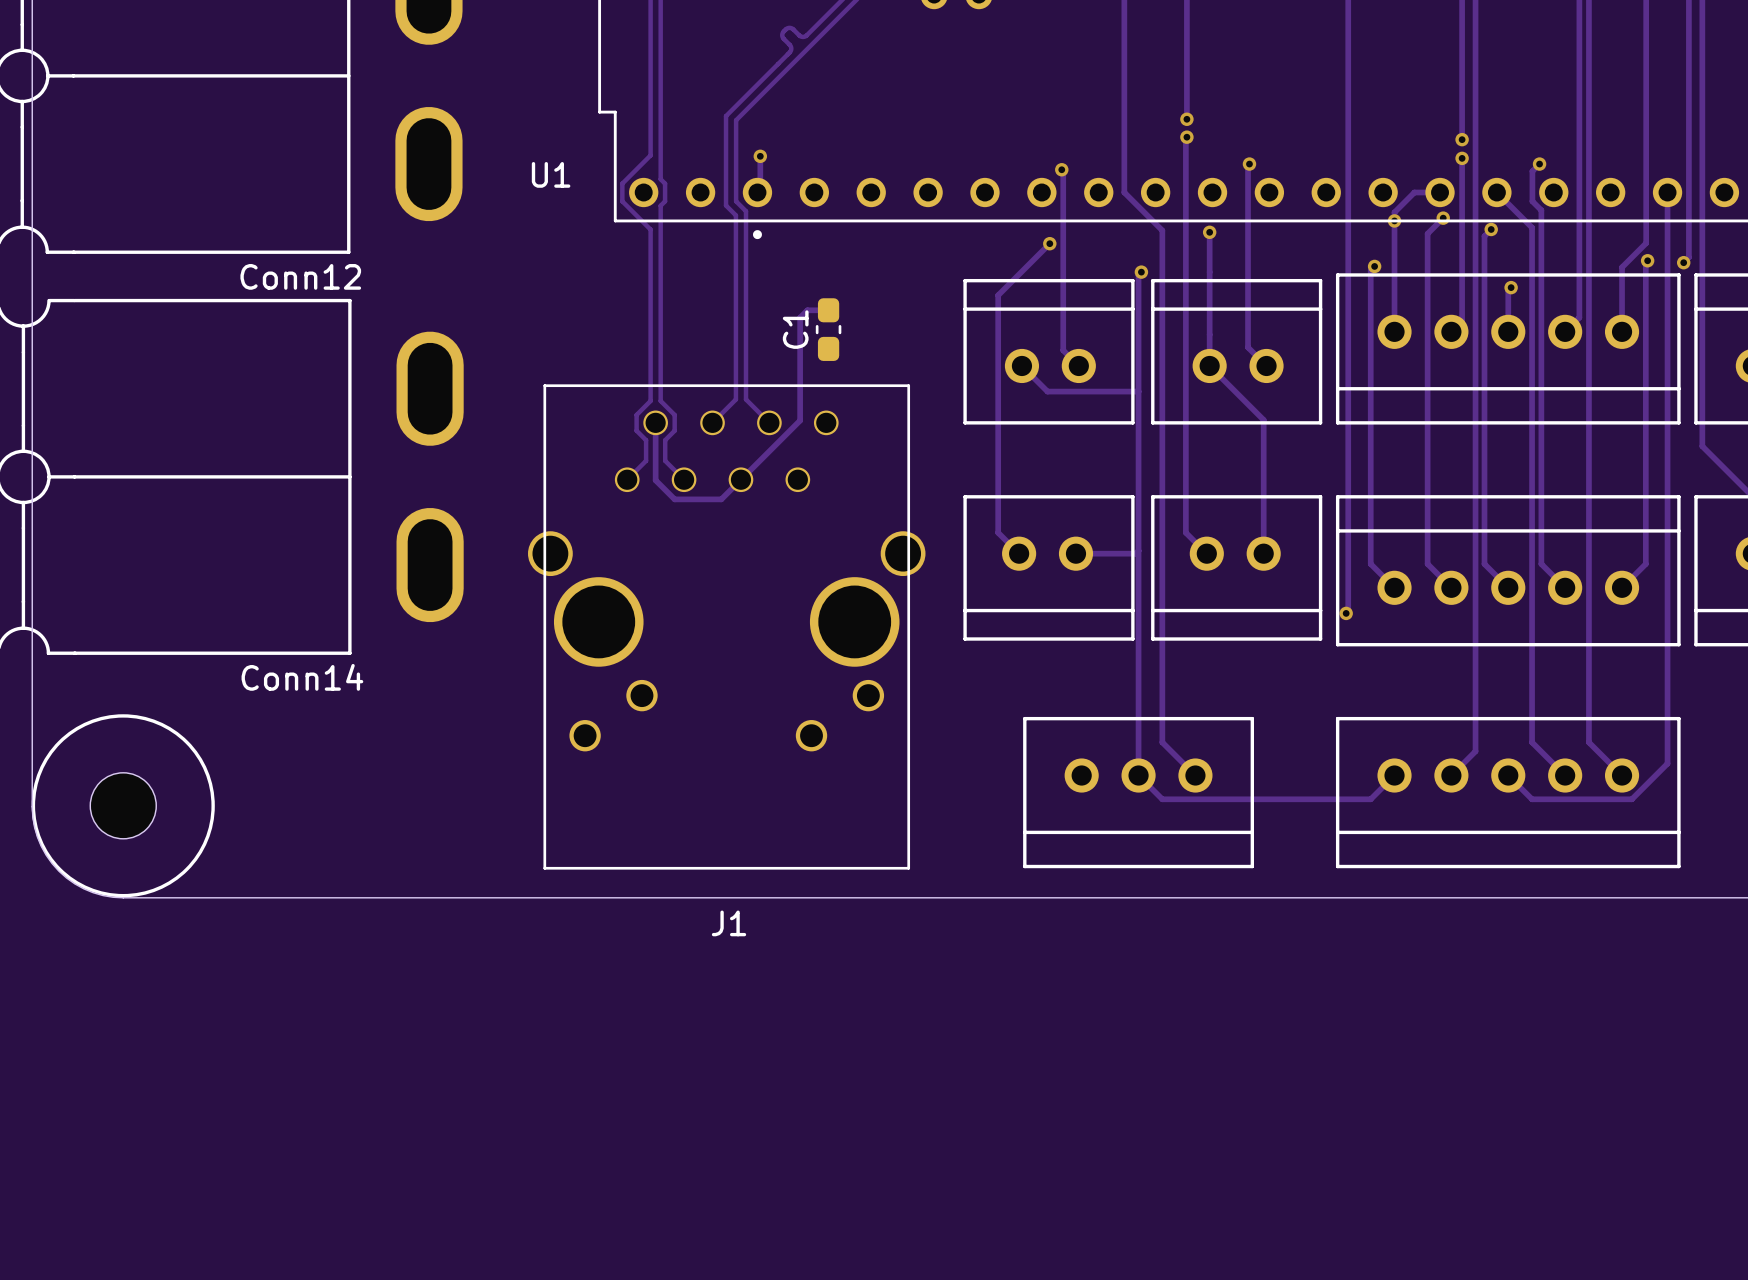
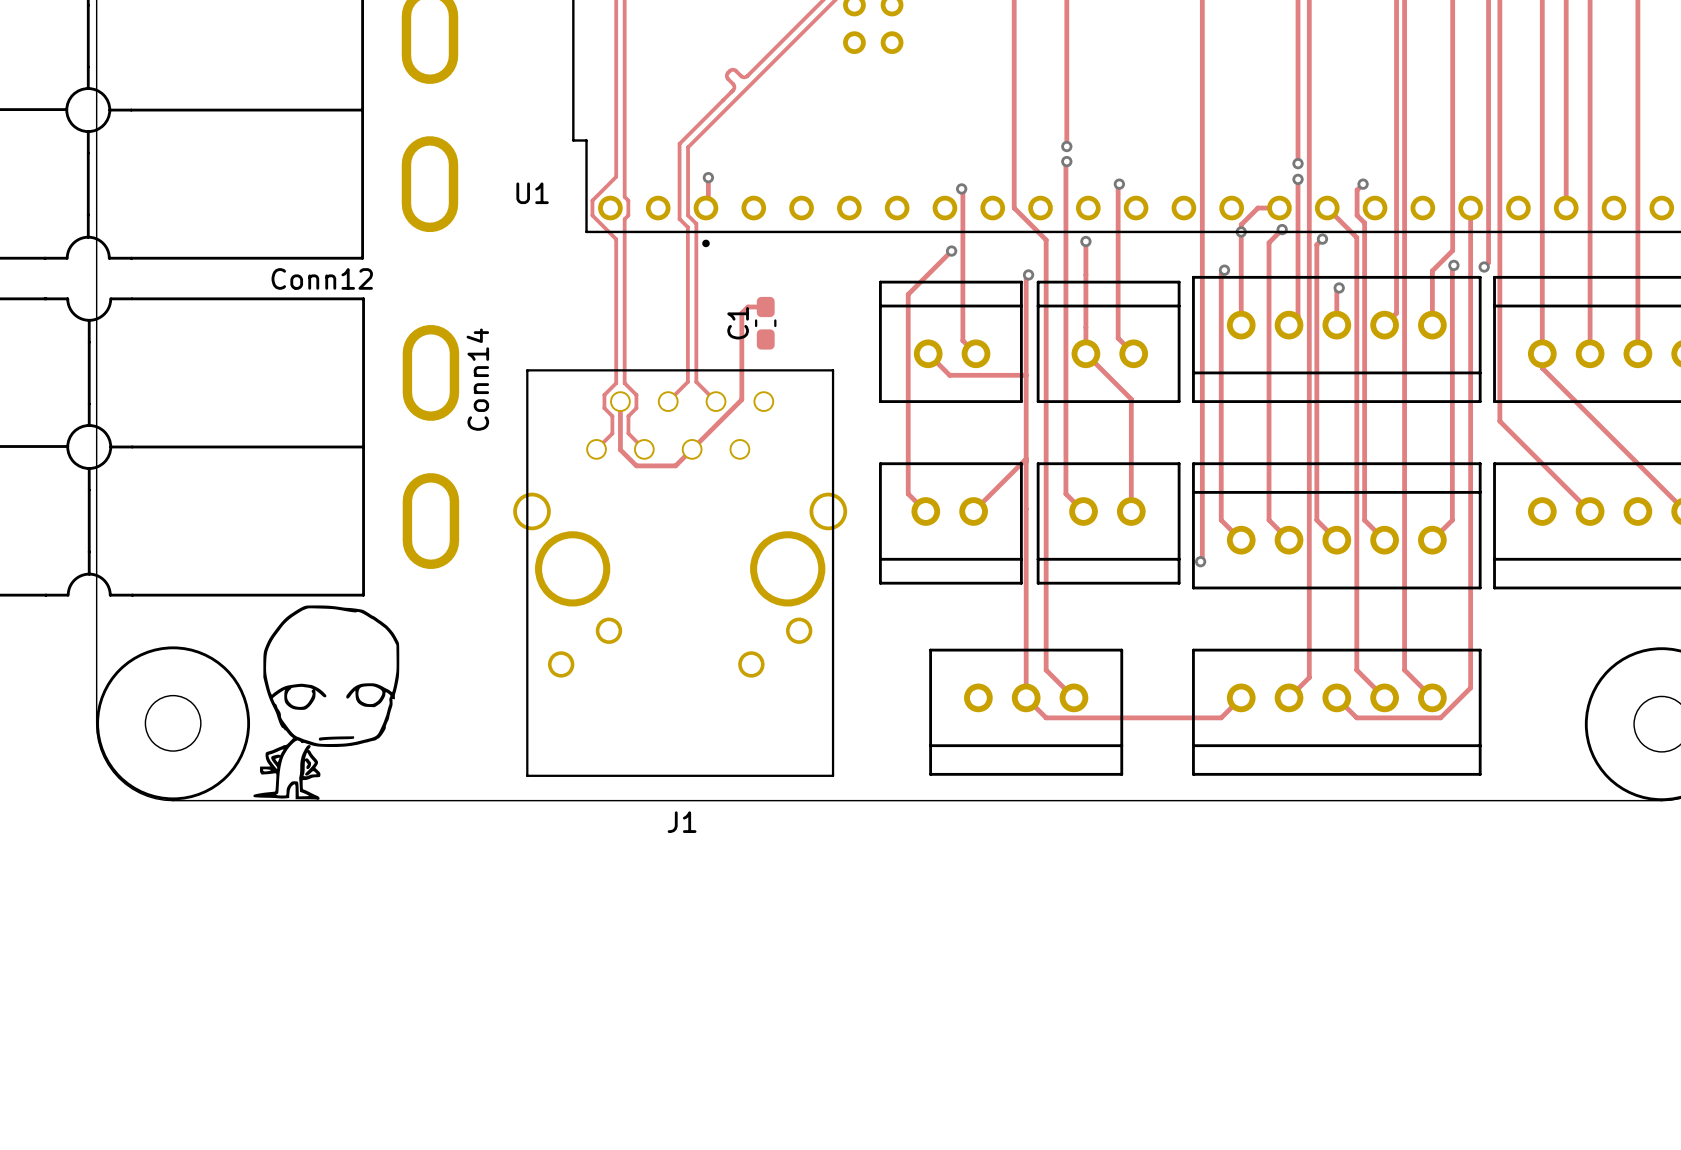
track: (1138, 550) (1135, 553) (1075, 553) -> (1026, 458) (973, 511)
Conn14 name rotation: 0° (302, 677) -> 90° counterclockwise (477, 379)
Conn14 name position: Conn14 (302, 677) -> Conn14 (477, 379)
part: none -> (326, 702)

